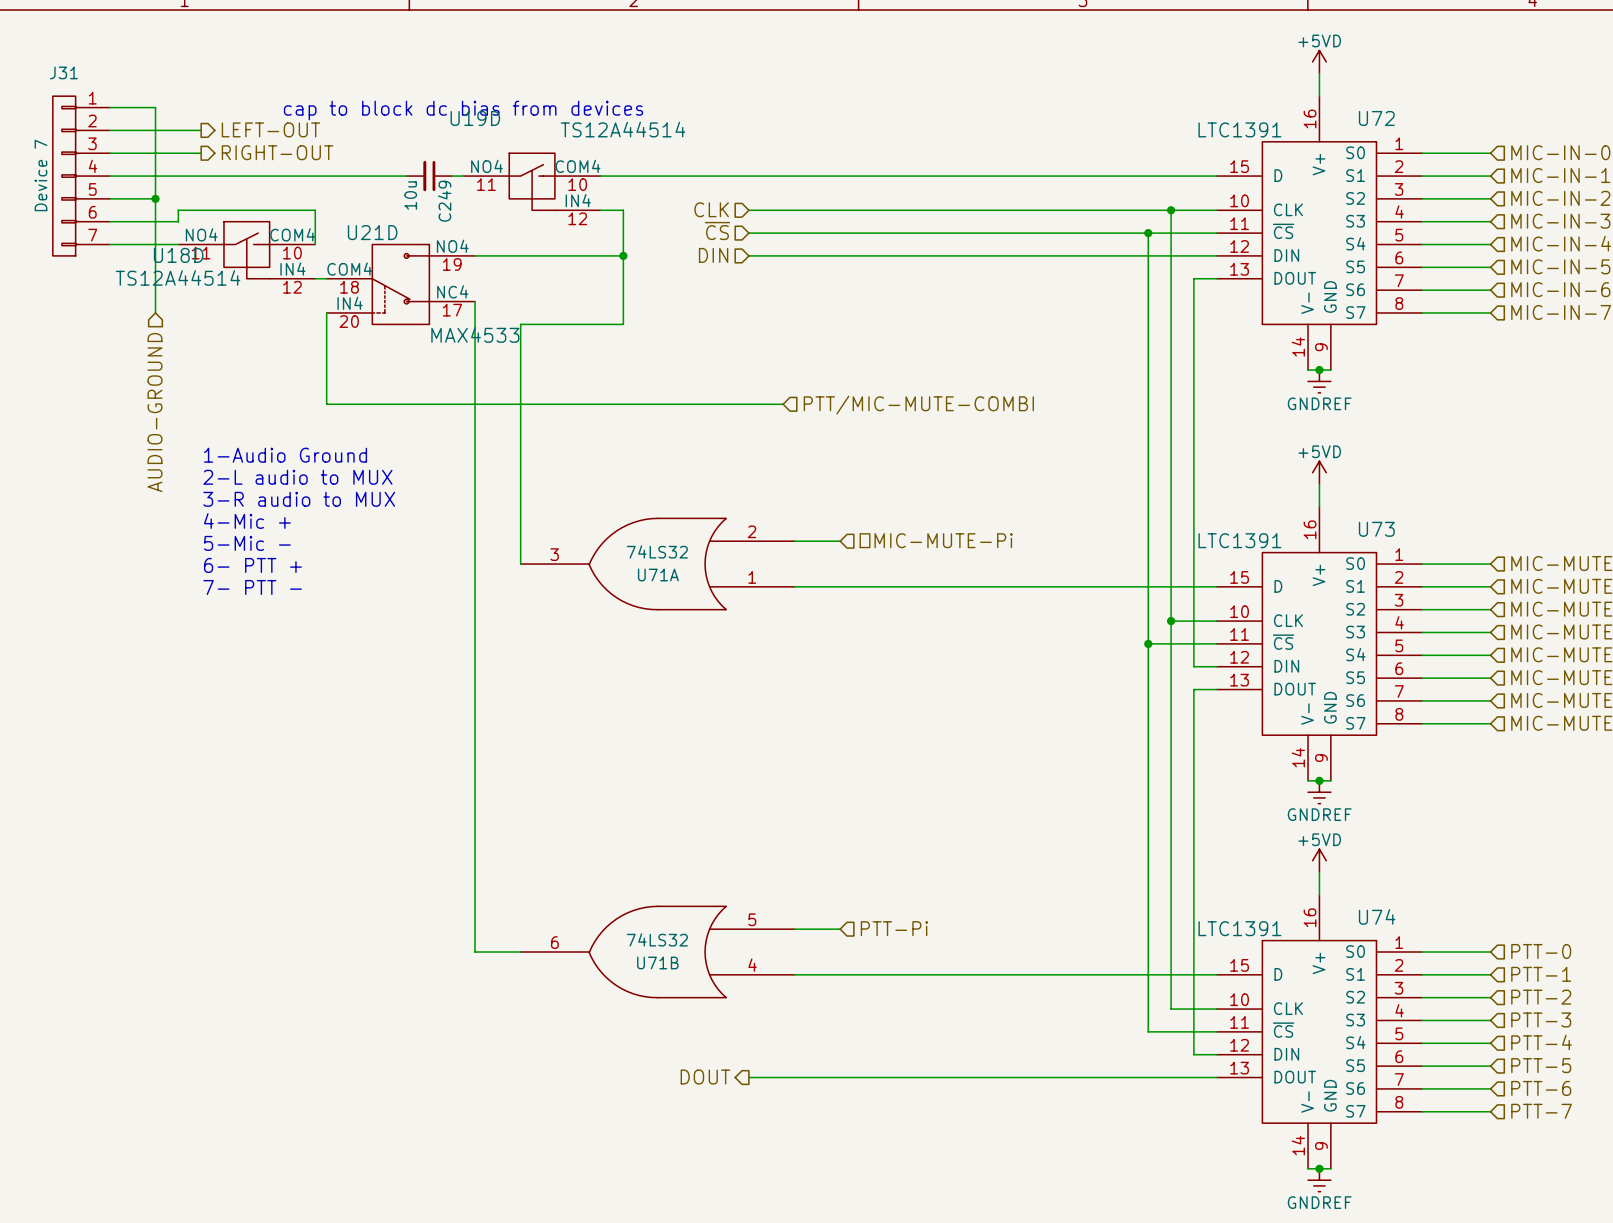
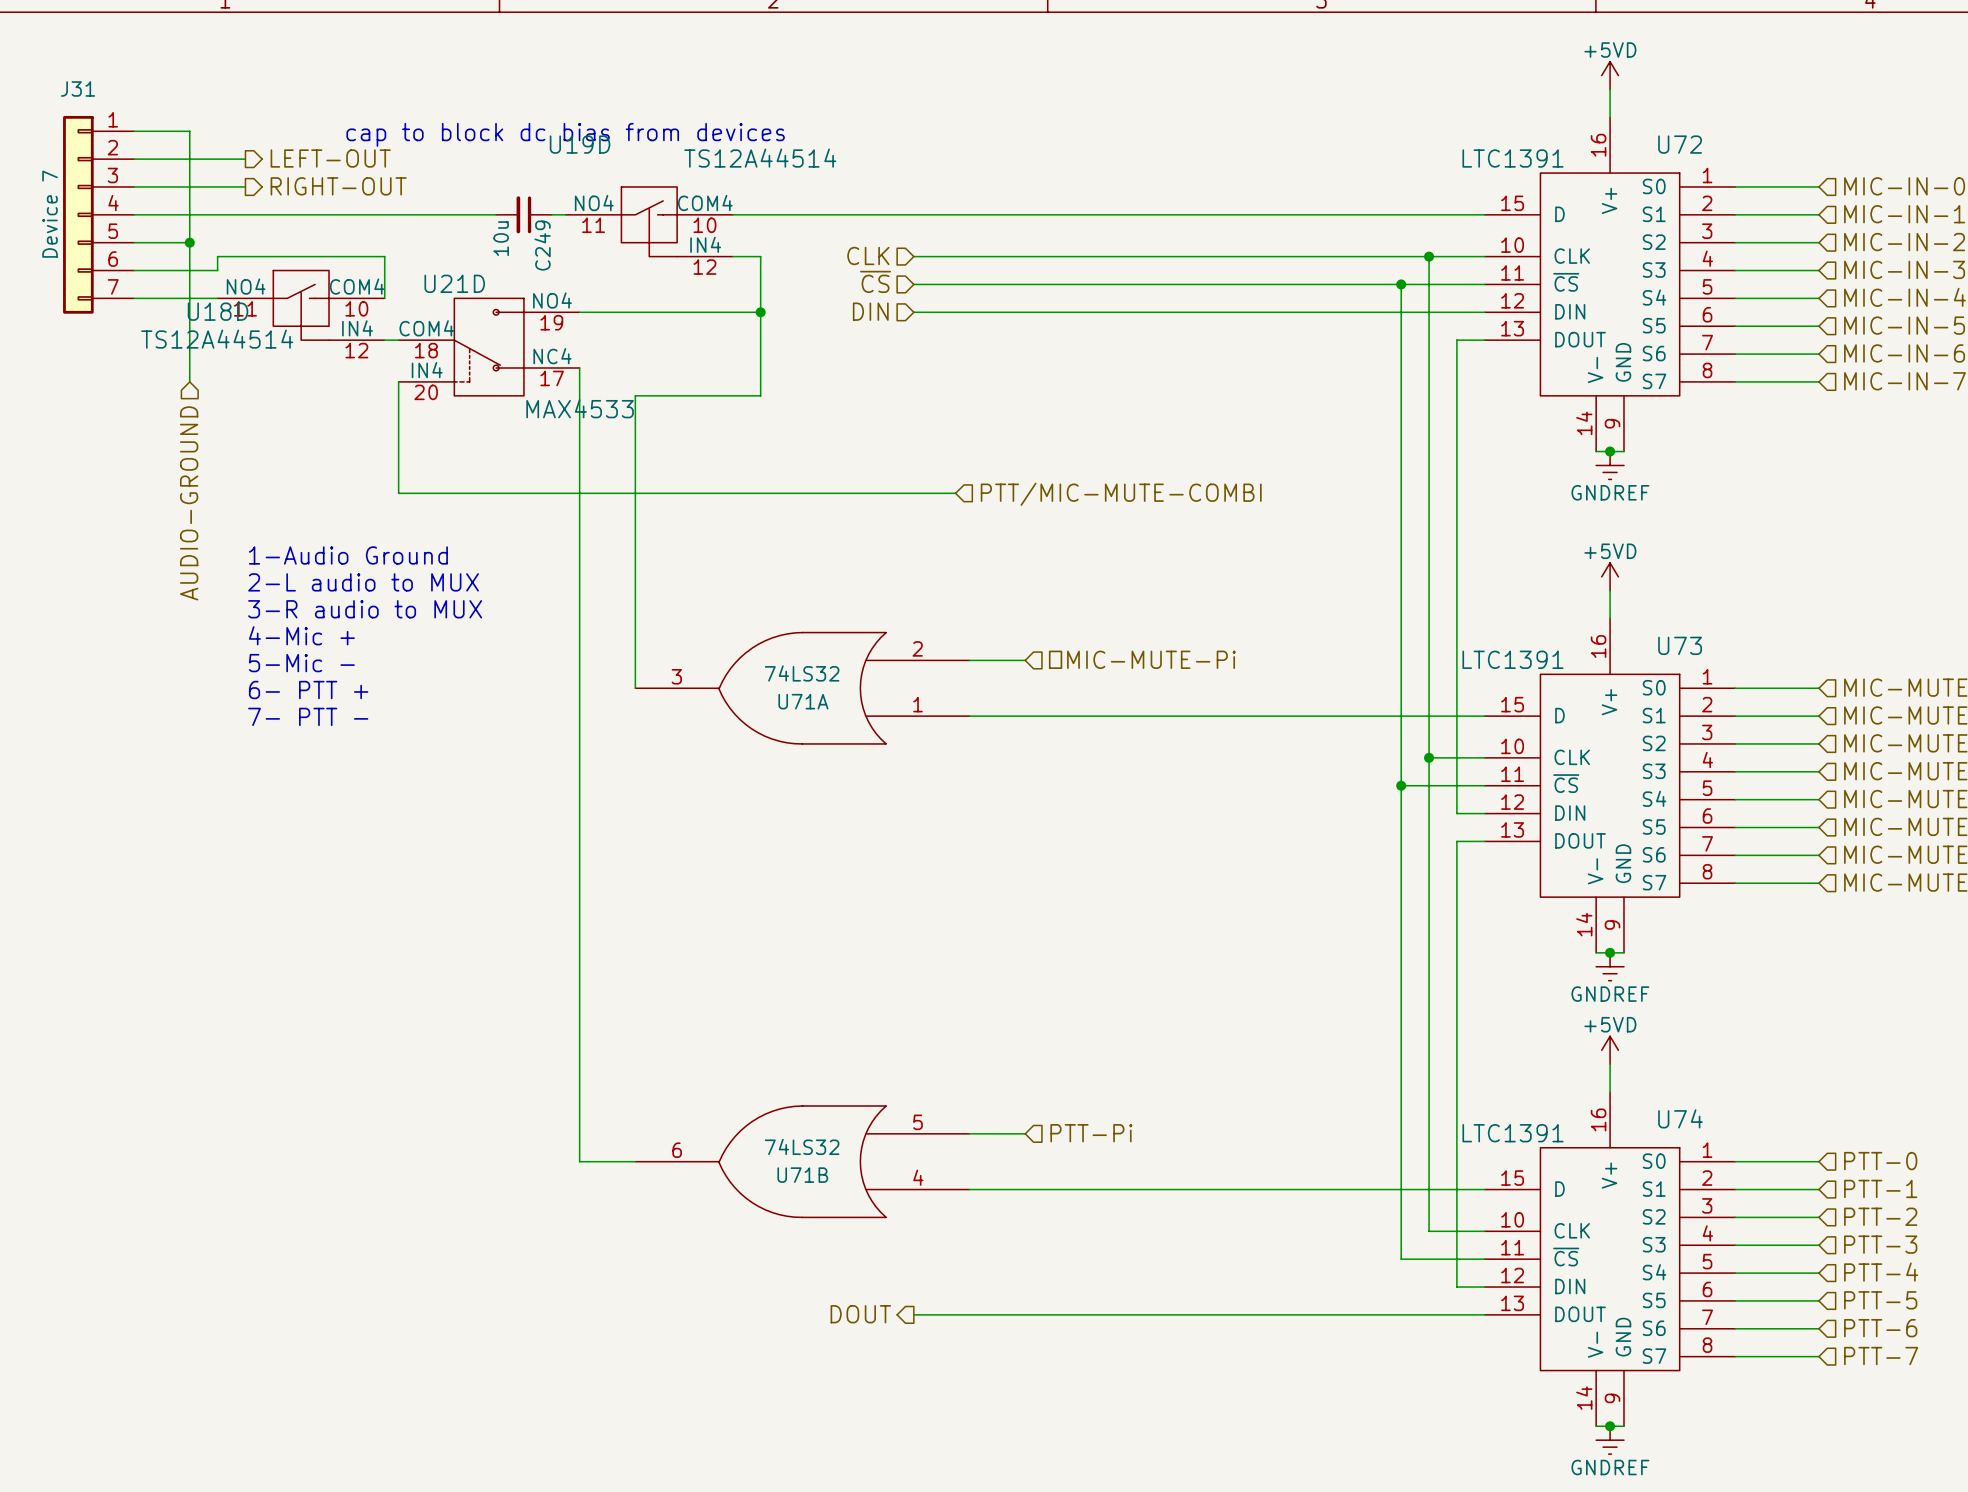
J31 symbol: [52, 96, 110, 256] -> [63, 115, 135, 314]

